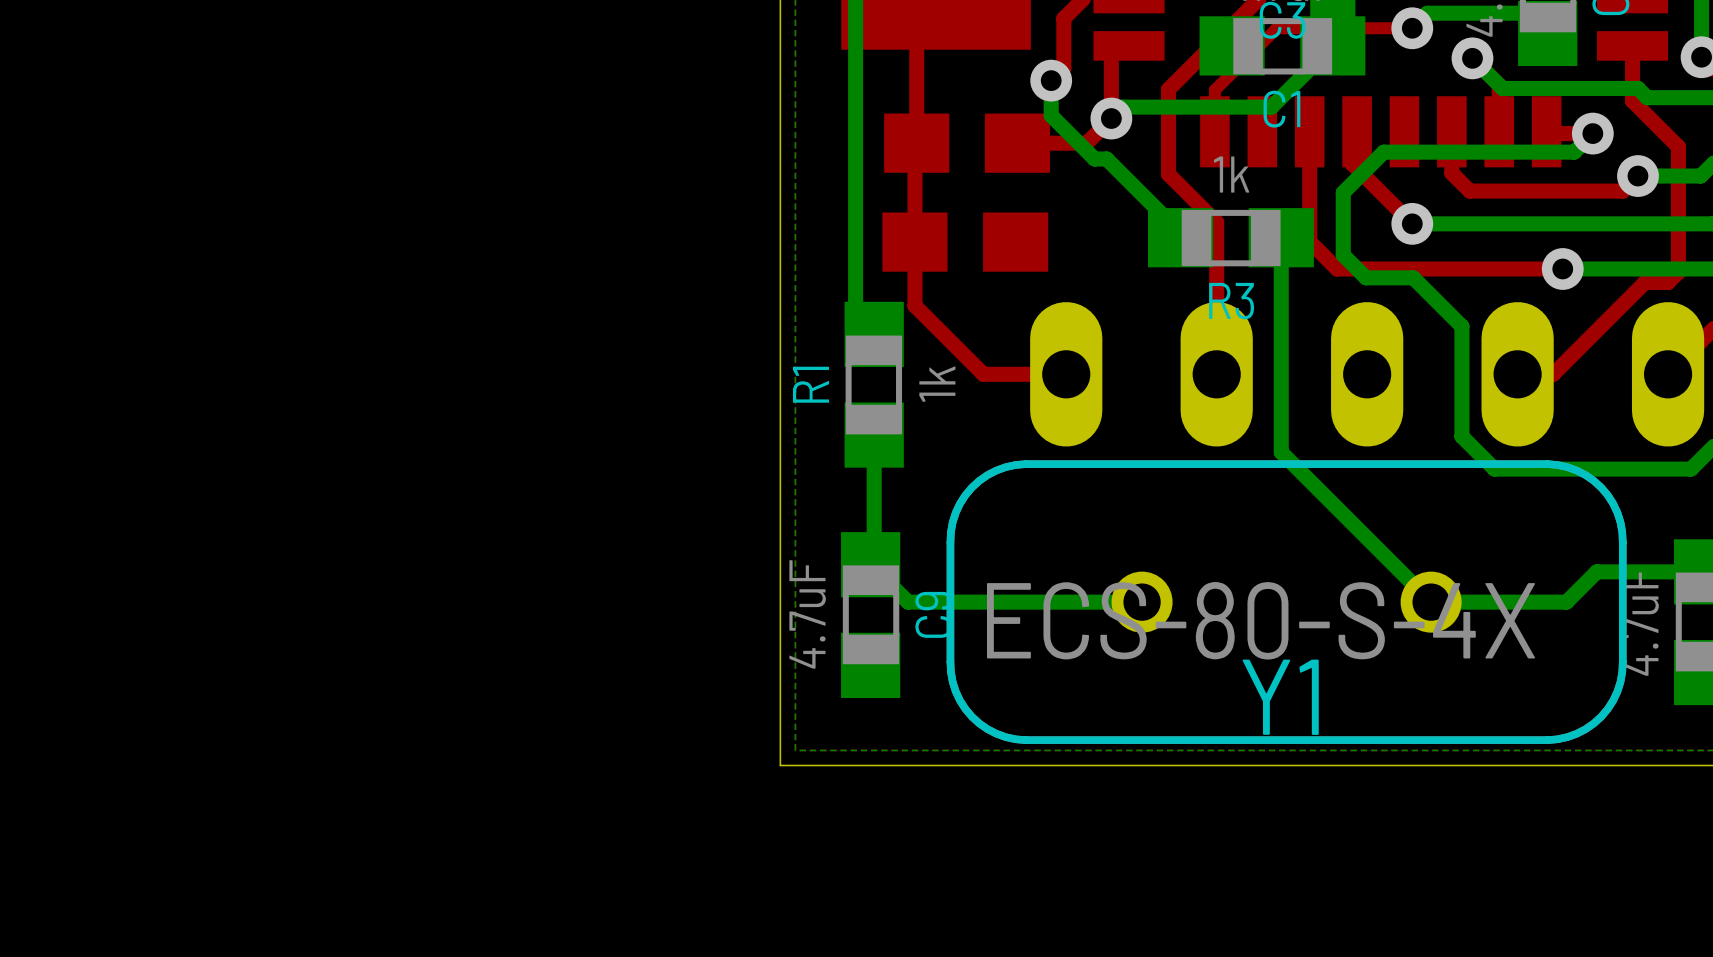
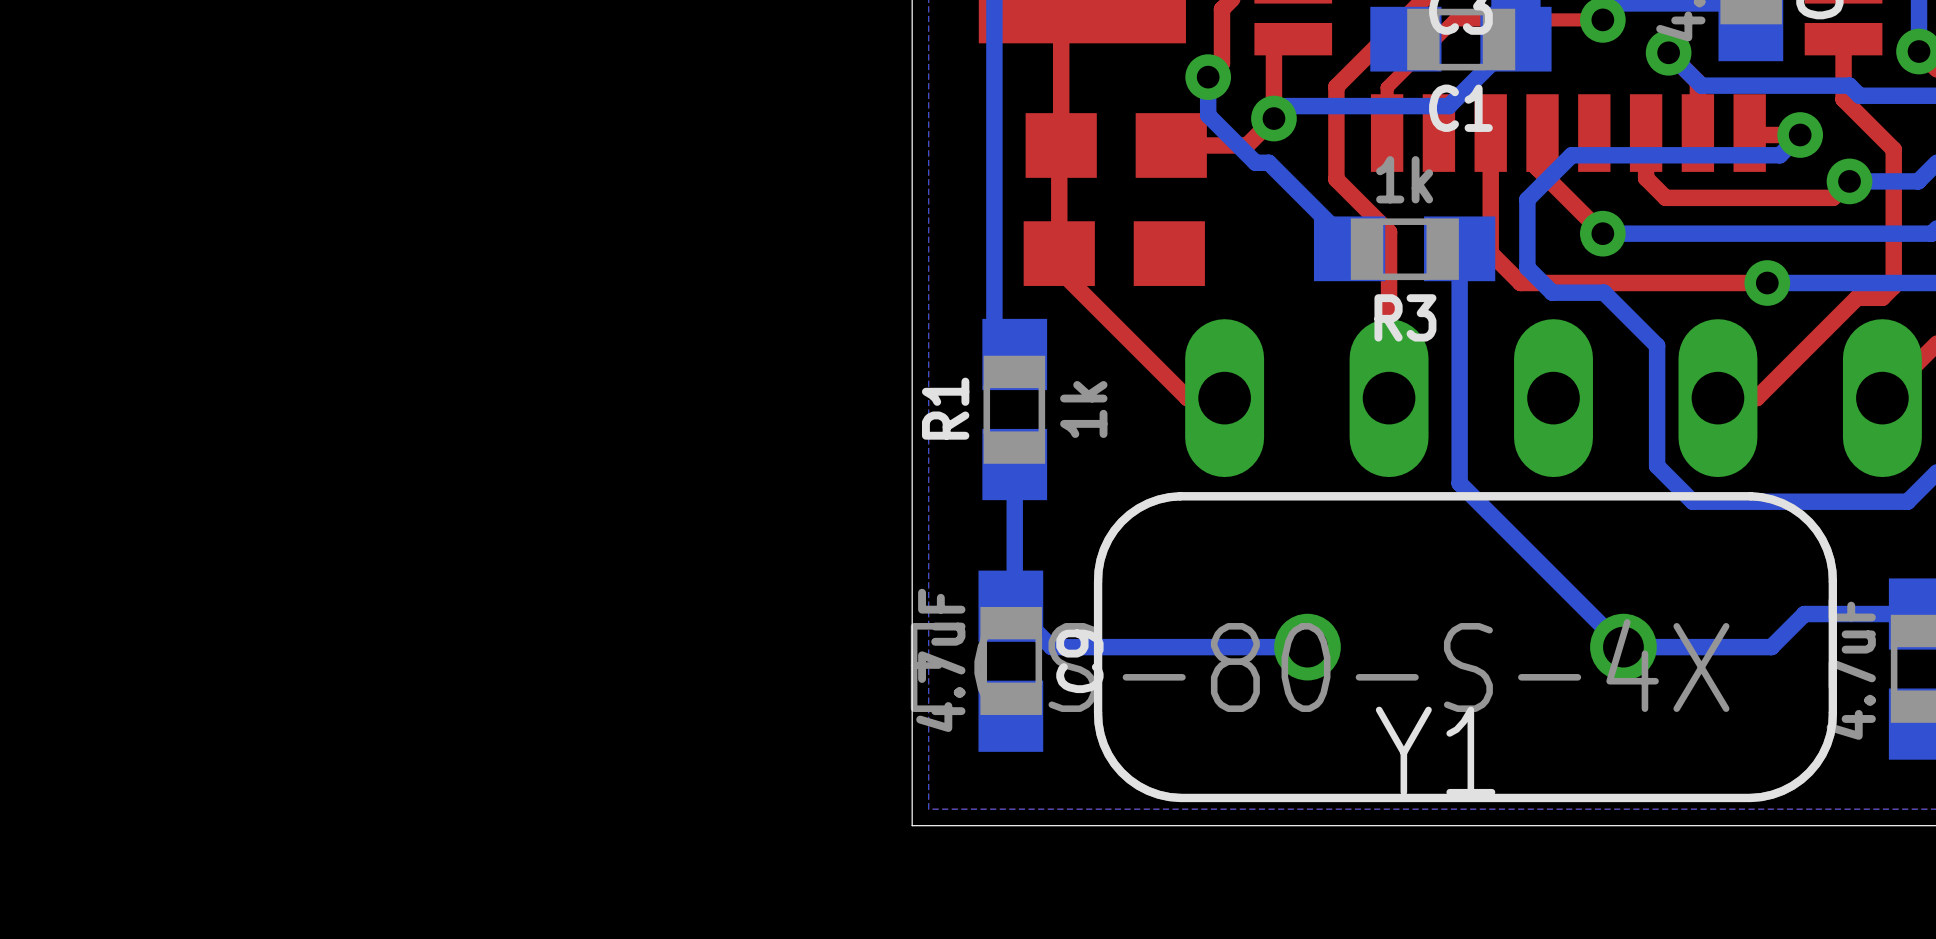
top track: (914, 257) (914, 305) (983, 374) (1032, 374) -> (1059, 270) (1187, 398)

